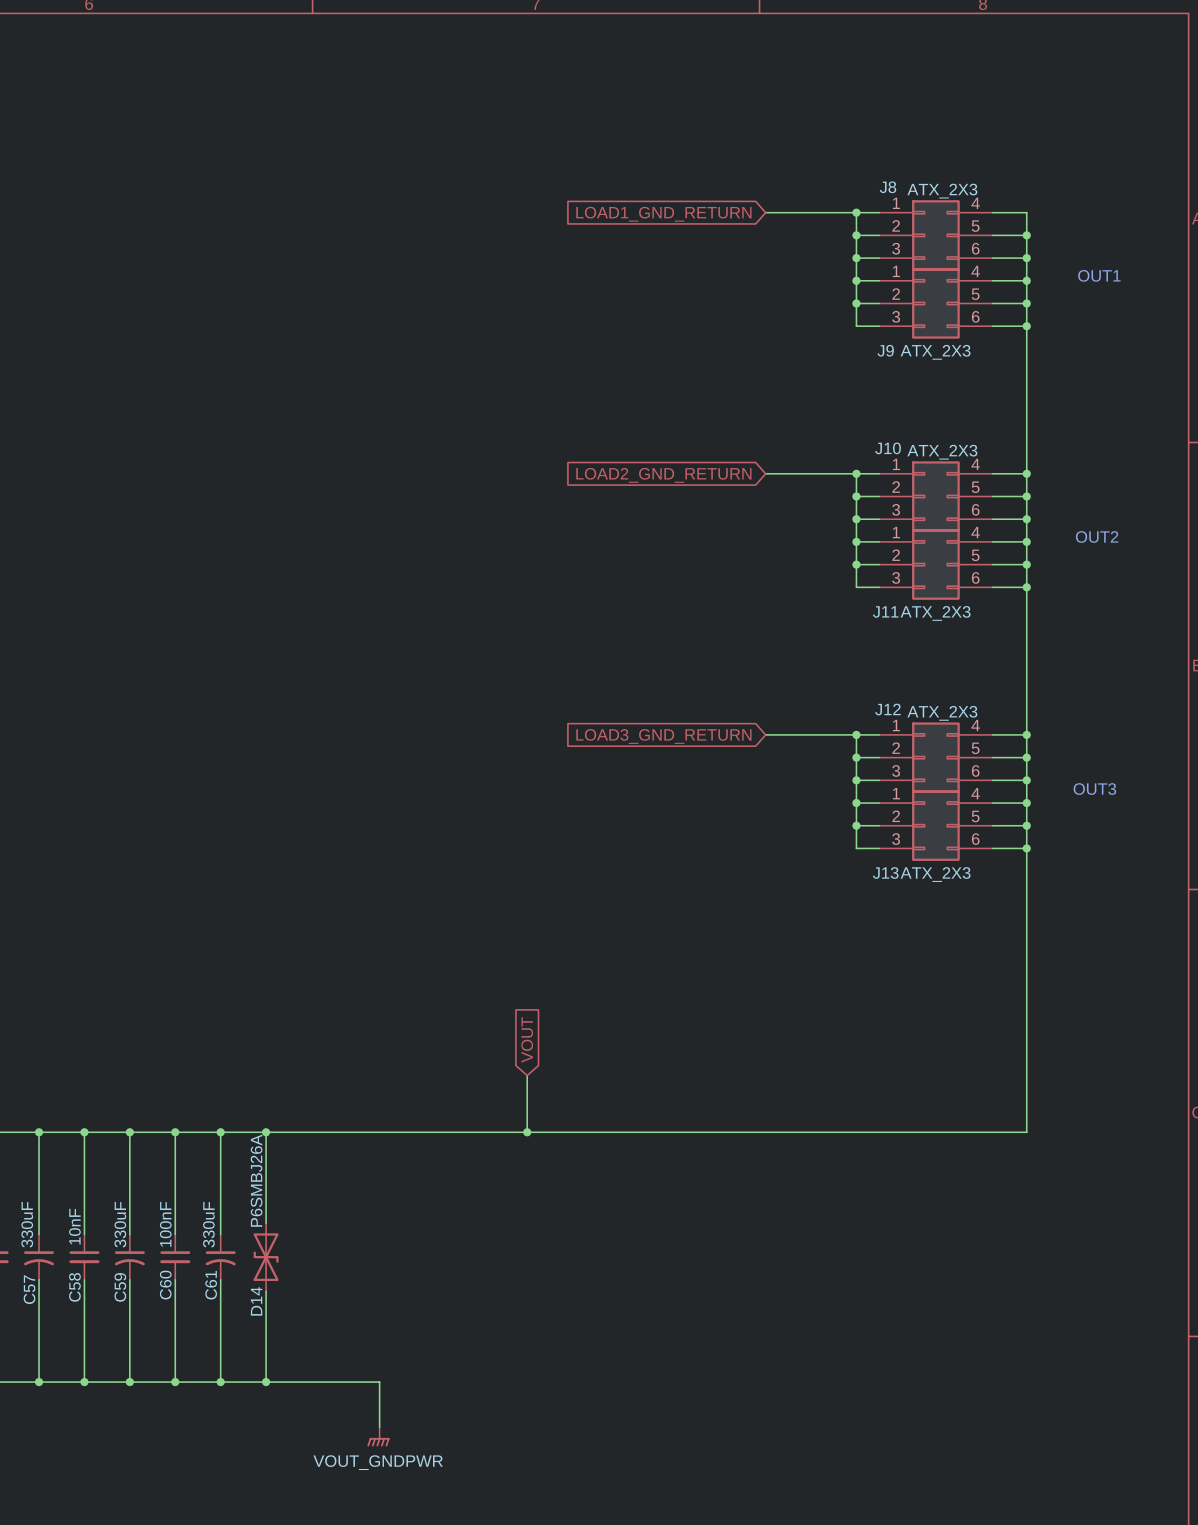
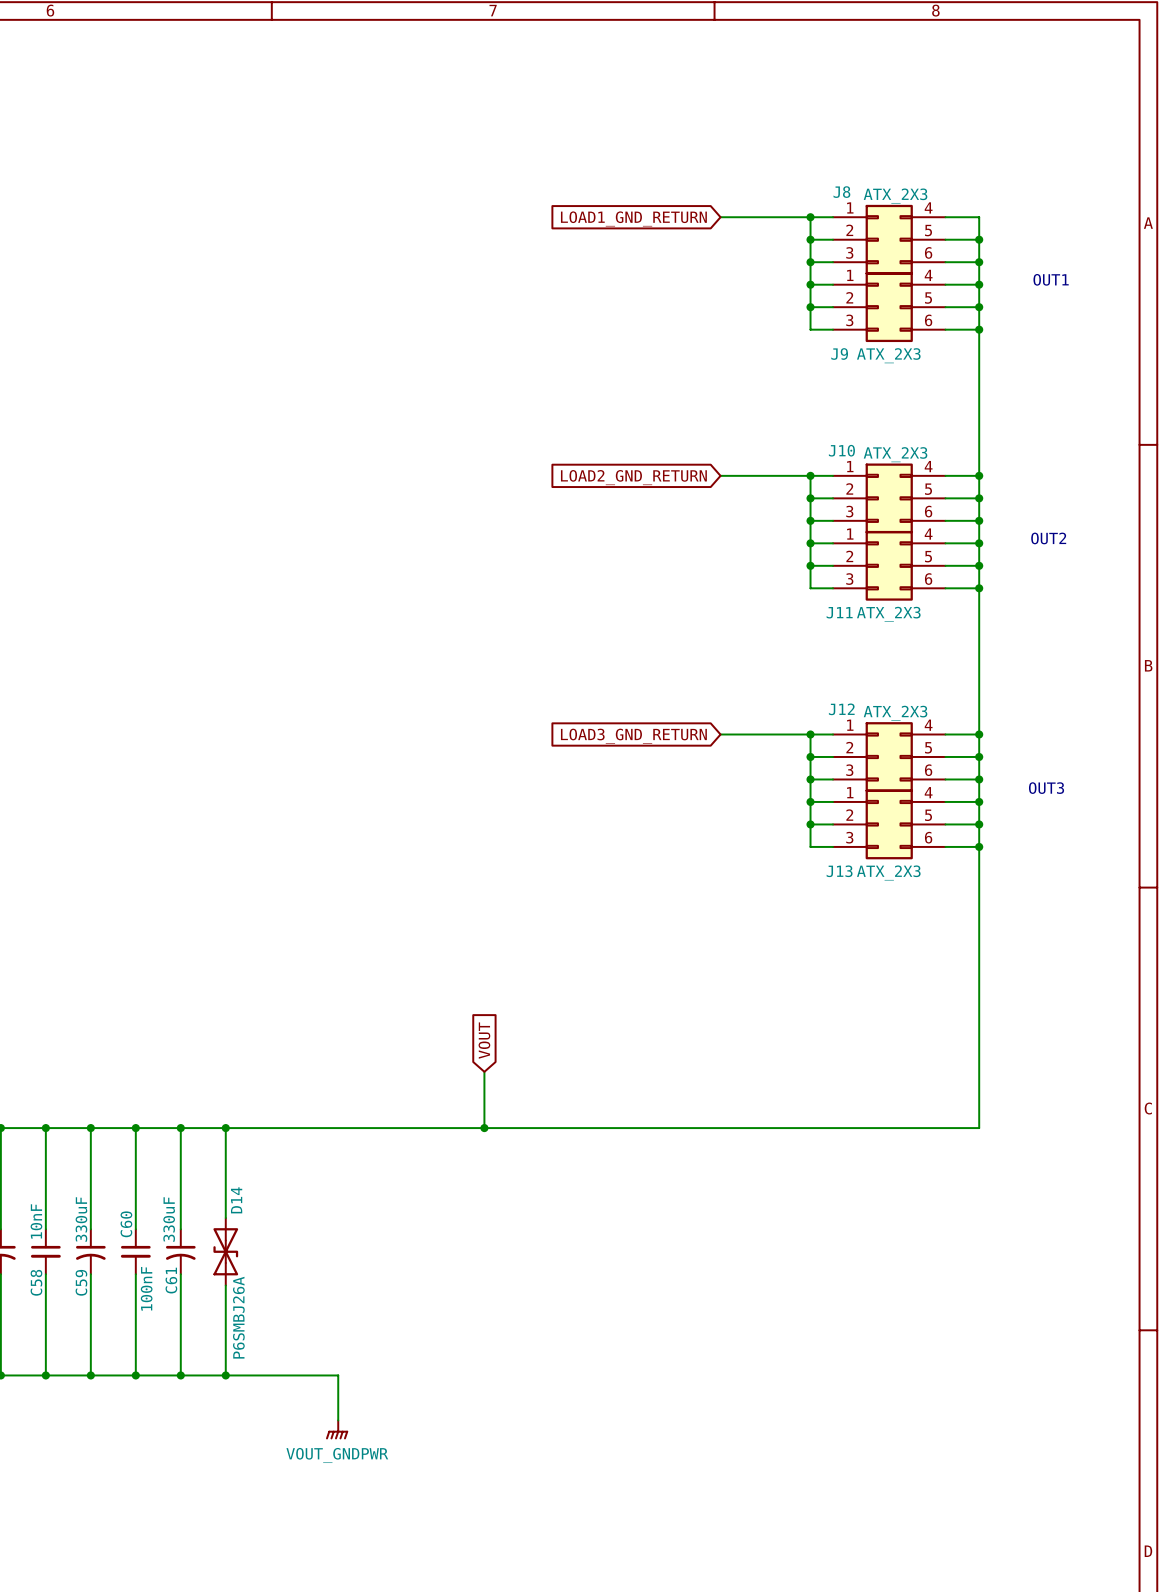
D14 value position: P6SMBJ26A (256, 1180) -> P6SMBJ26A (238, 1317)
C60 value position: 100nF (165, 1224) -> 100nF (146, 1288)
C60 name position: C60 (165, 1285) -> C60 (126, 1224)
D14 name position: D14 (256, 1301) -> D14 (236, 1200)

